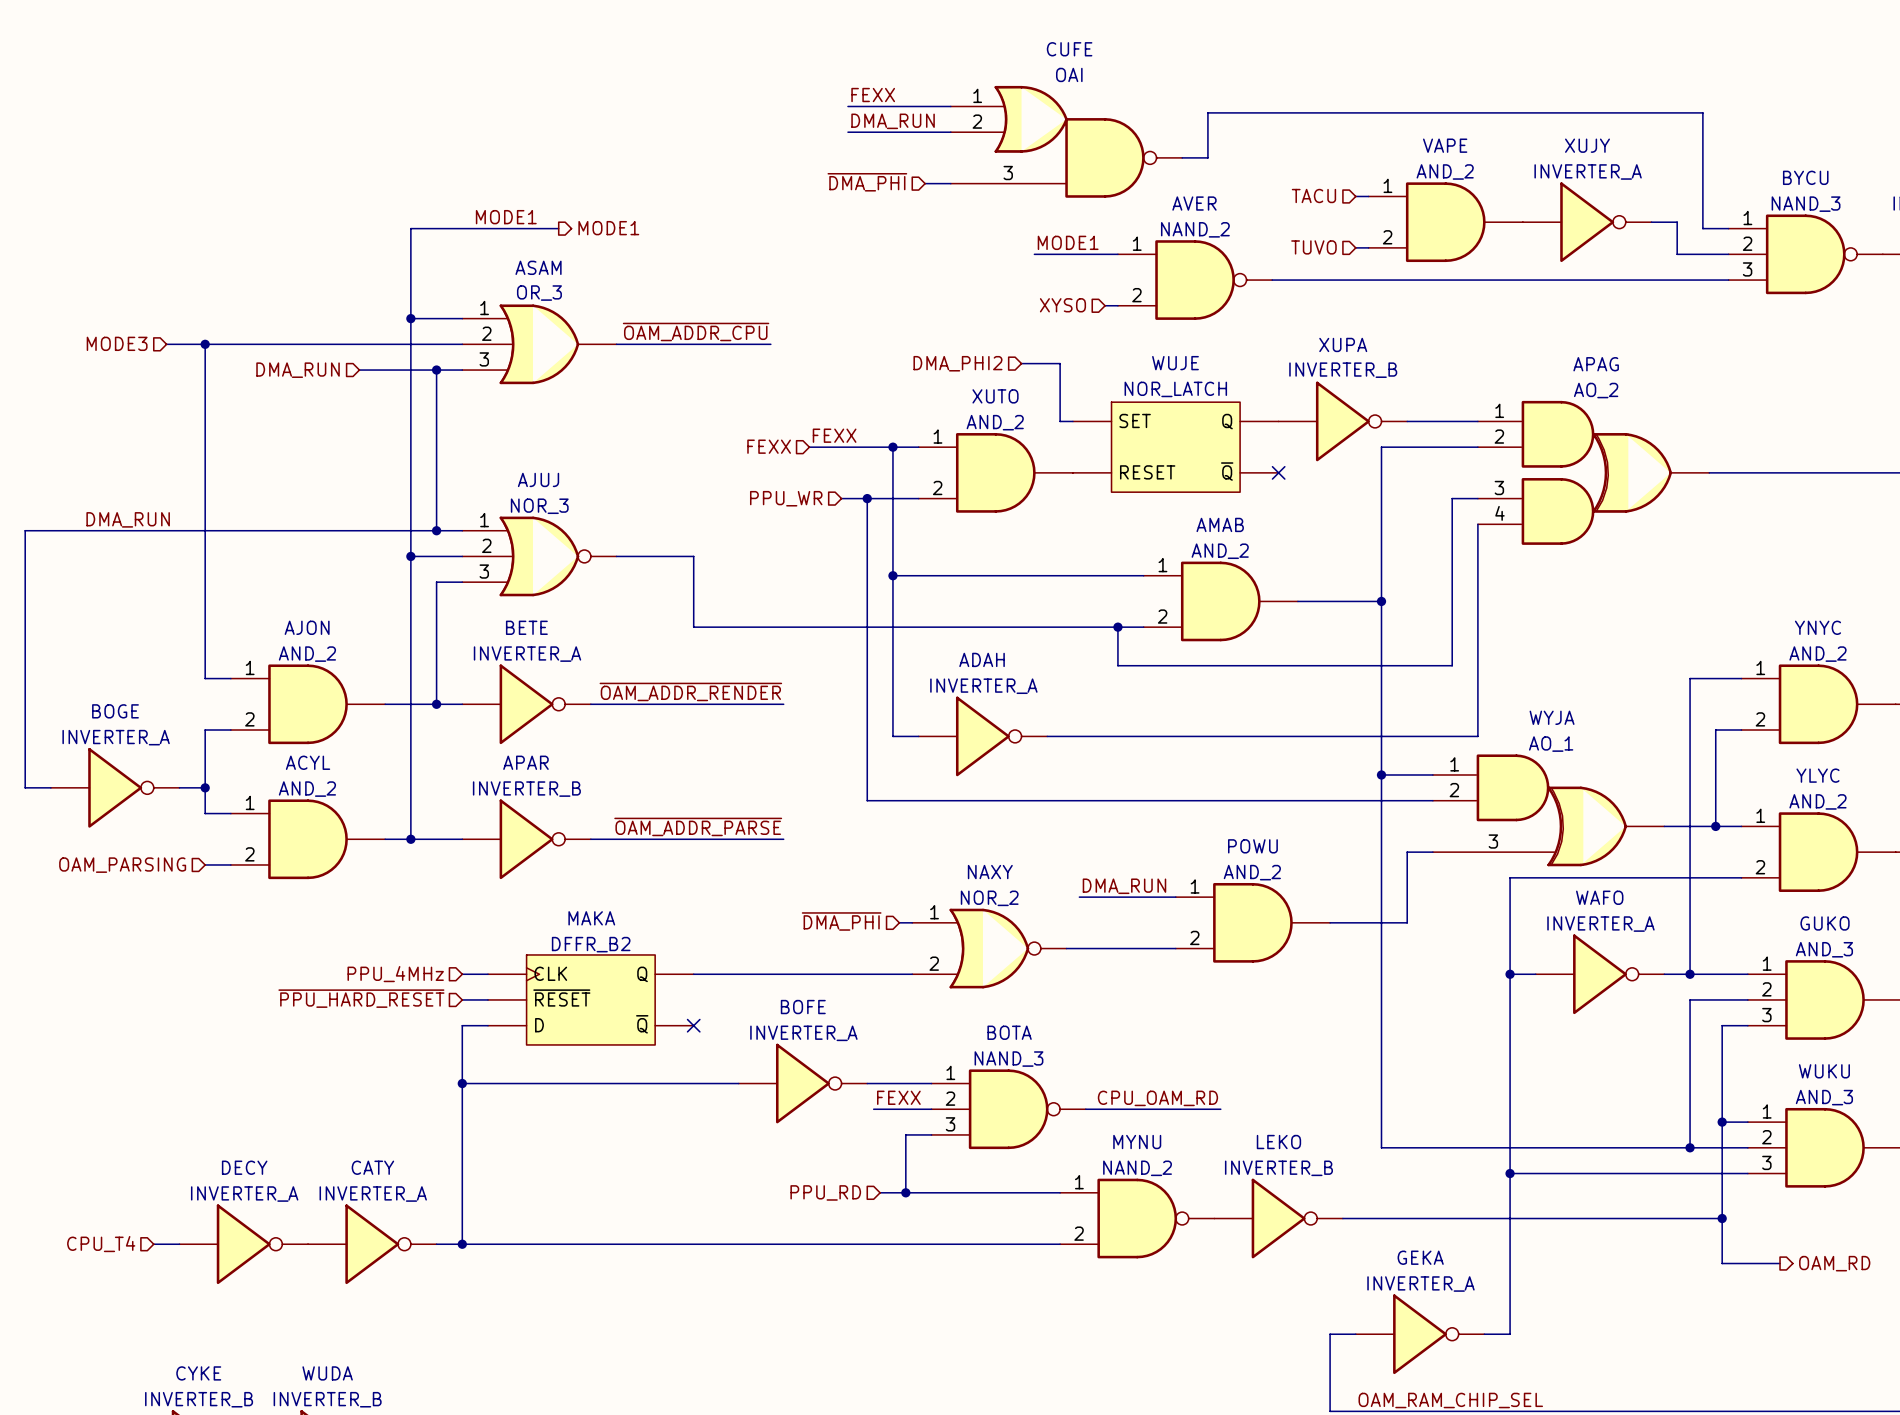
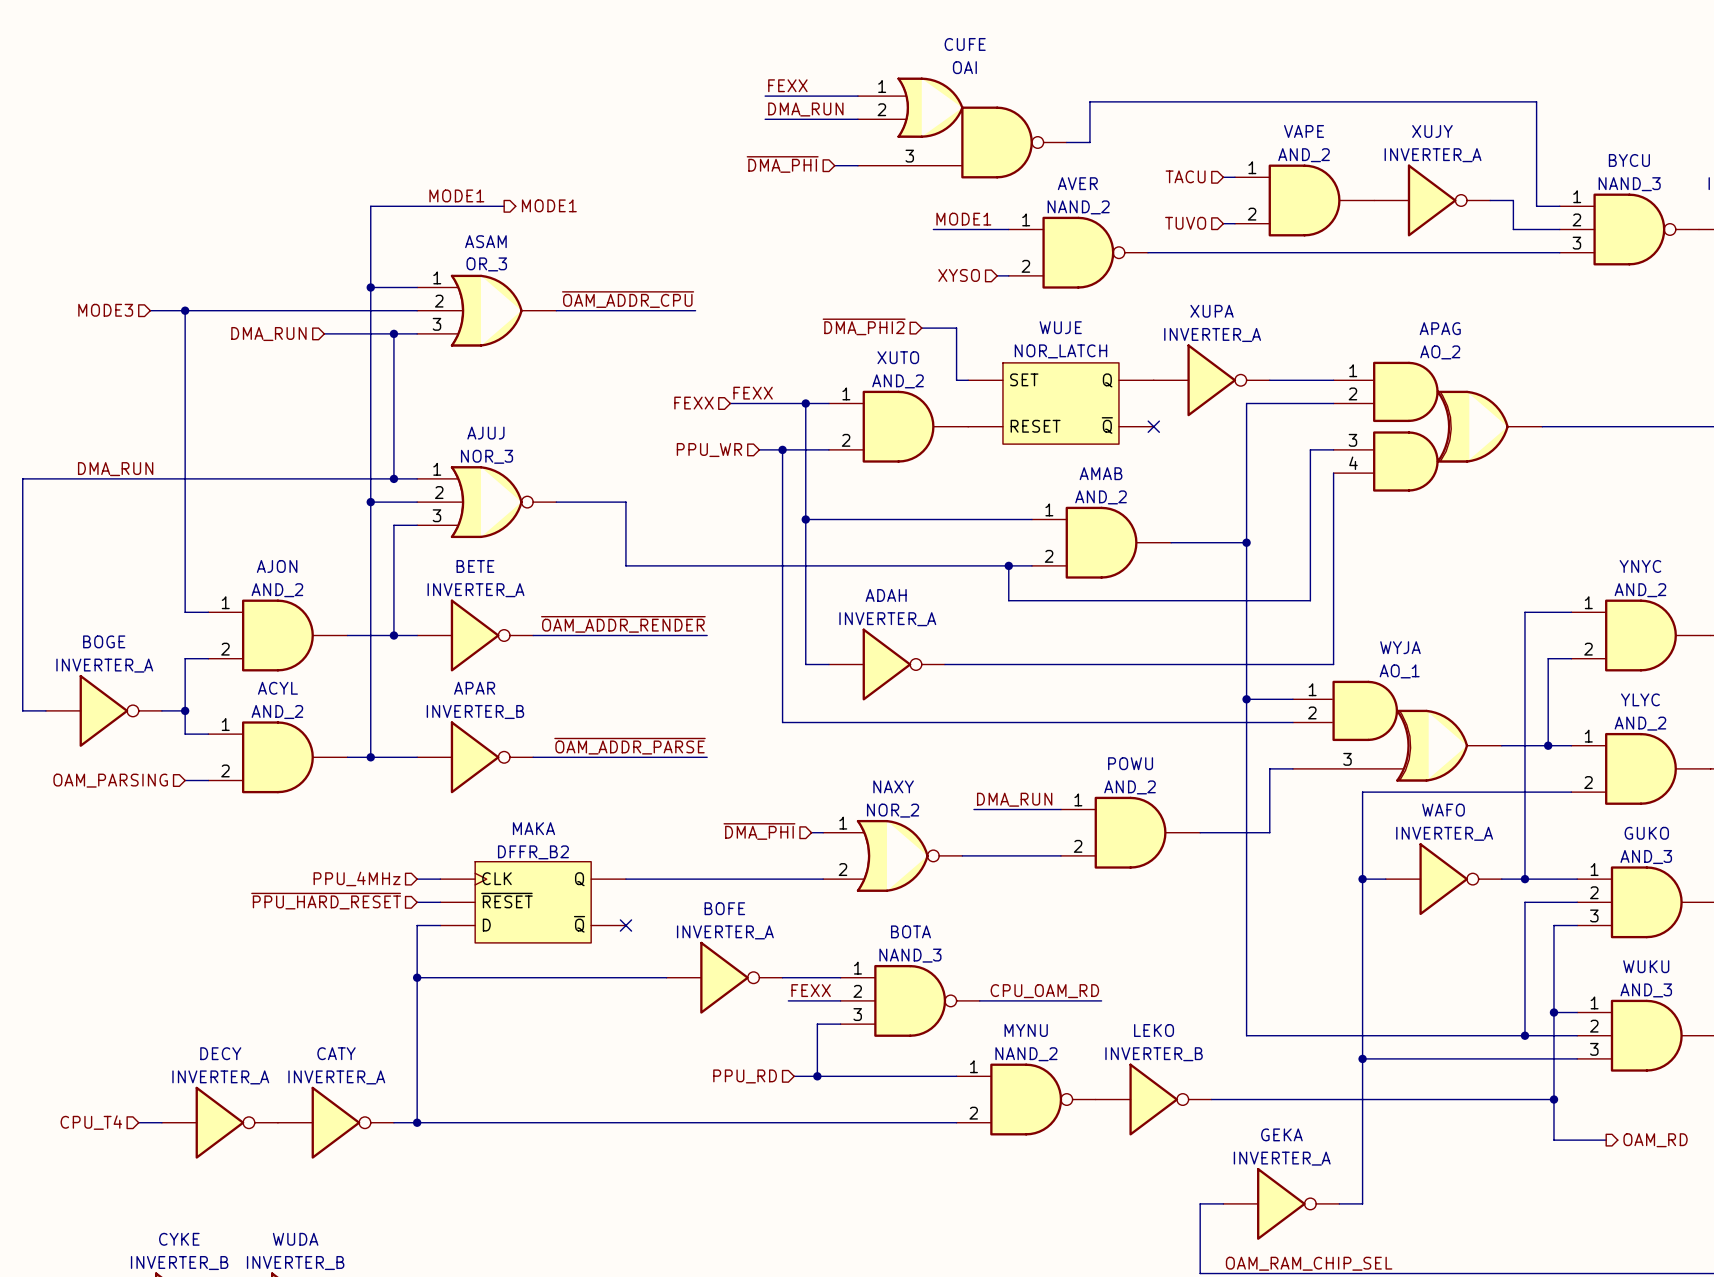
hierarchical label: DMA_PHI2 (957, 363) -> ~{DMA_PHI2} (864, 326)
XUPA value: INVERTER_B (1343, 370) -> INVERTER_A (1212, 334)

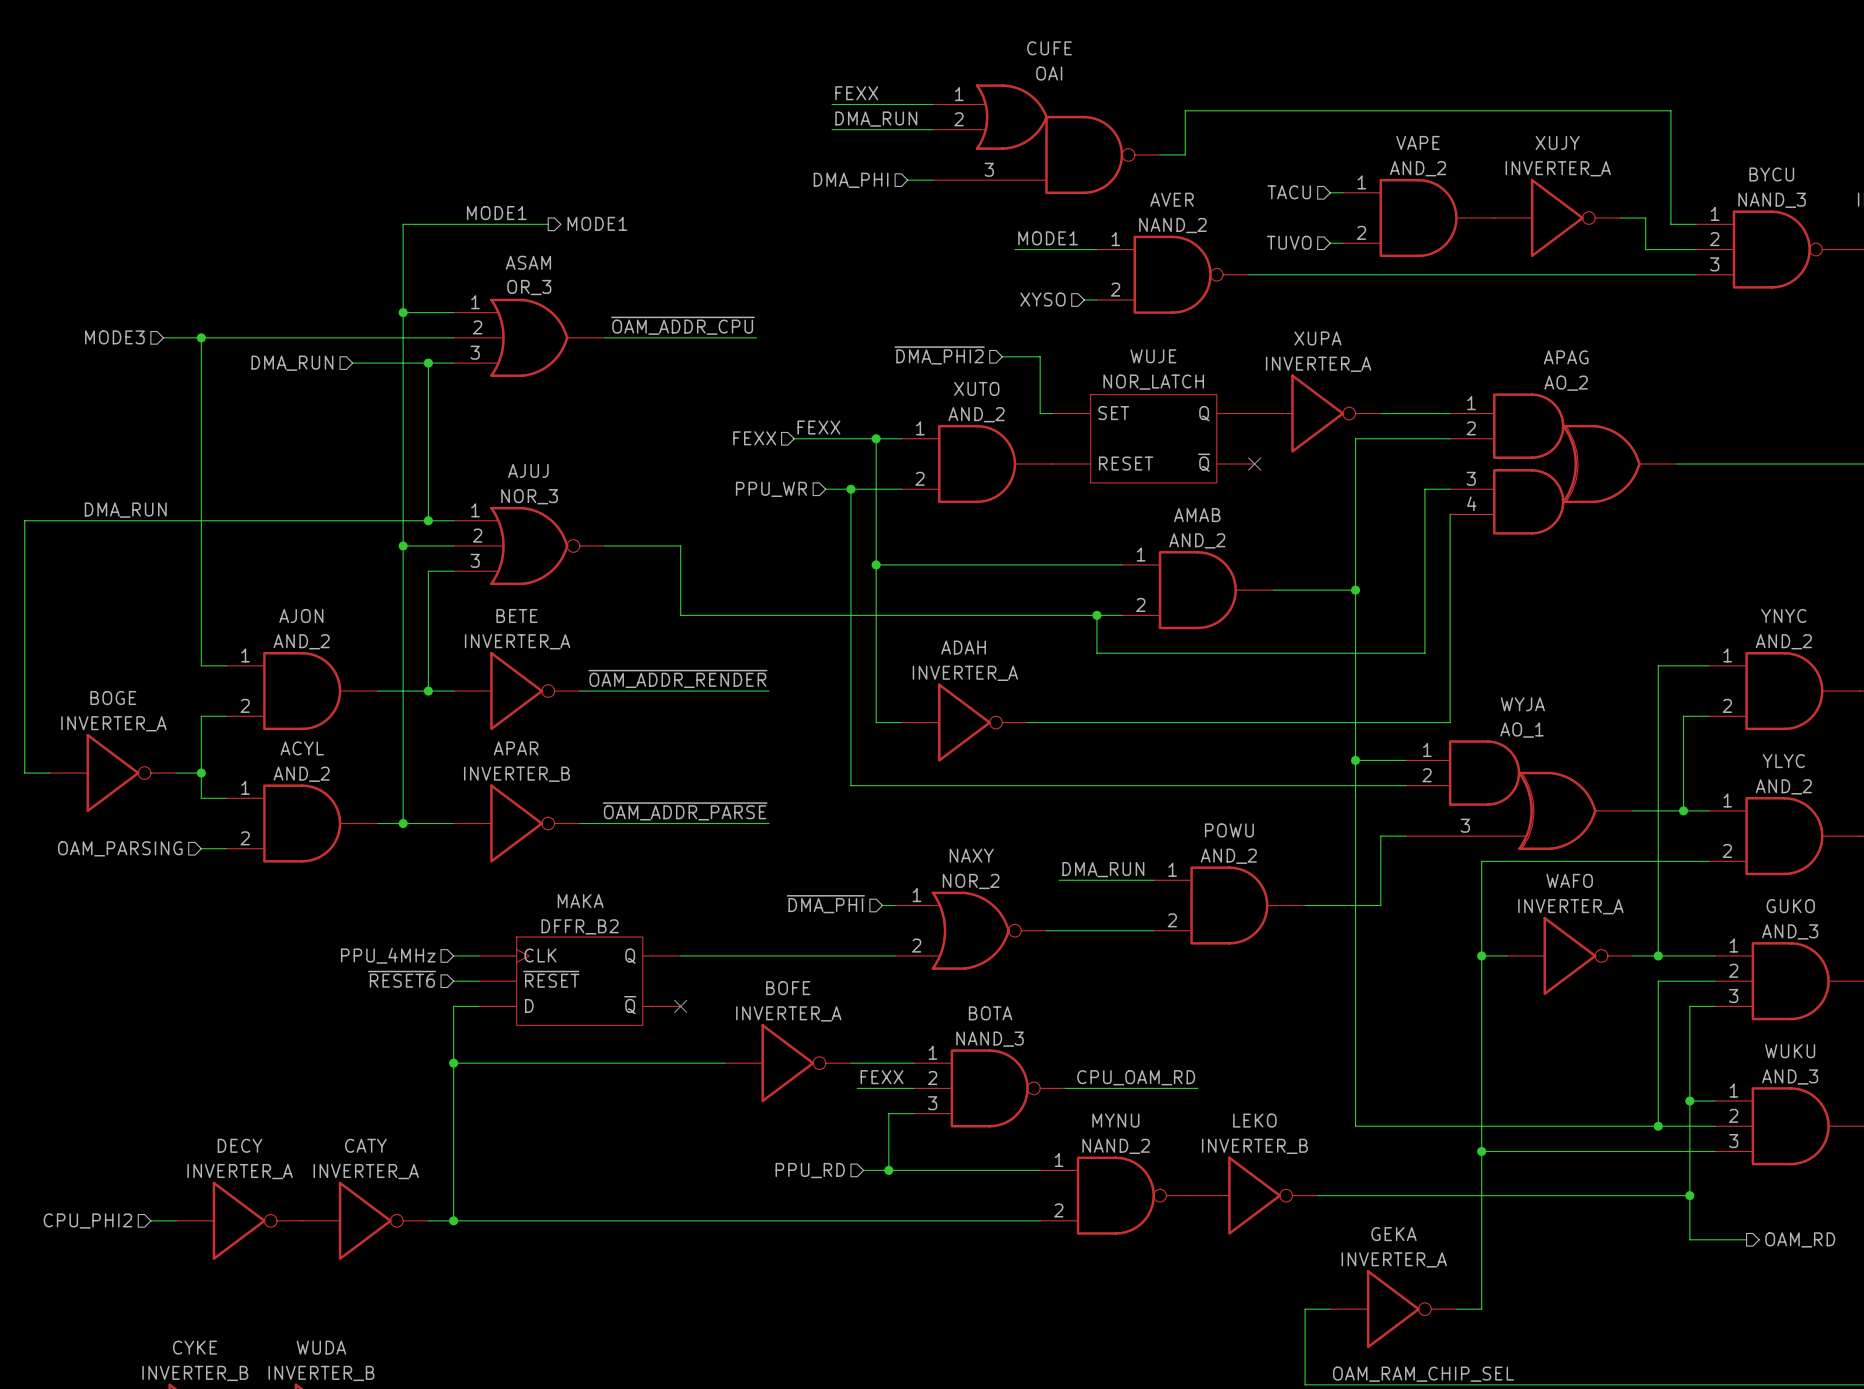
hierarchical label: ~{DMA_PHI} (782, 164) -> DMA_PHI (851, 180)
hierarchical label: ~{PPU_HARD_RESET} (326, 901) -> ~{RESET6} (402, 979)
hierarchical label: CPU_T4 (91, 1122) -> CPU_PHI2 (87, 1220)

